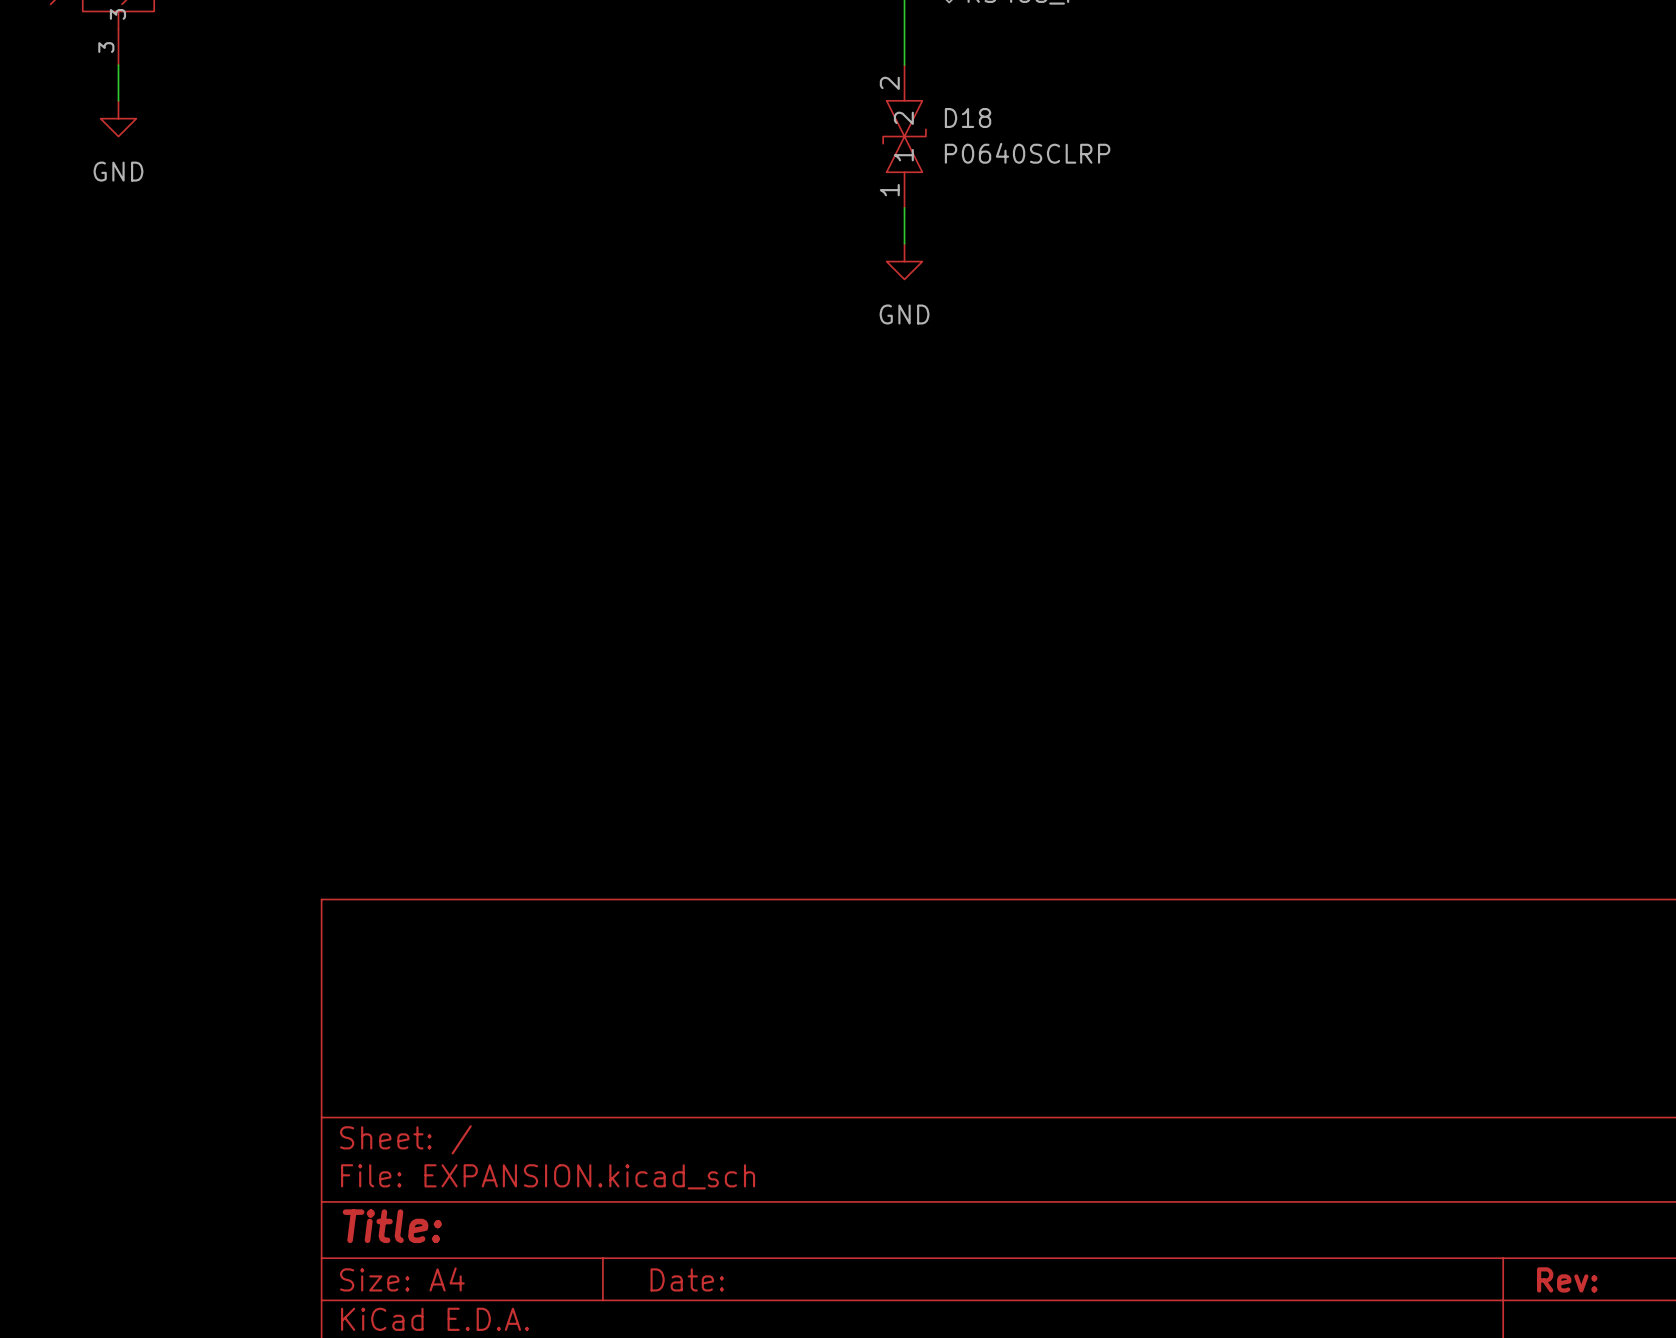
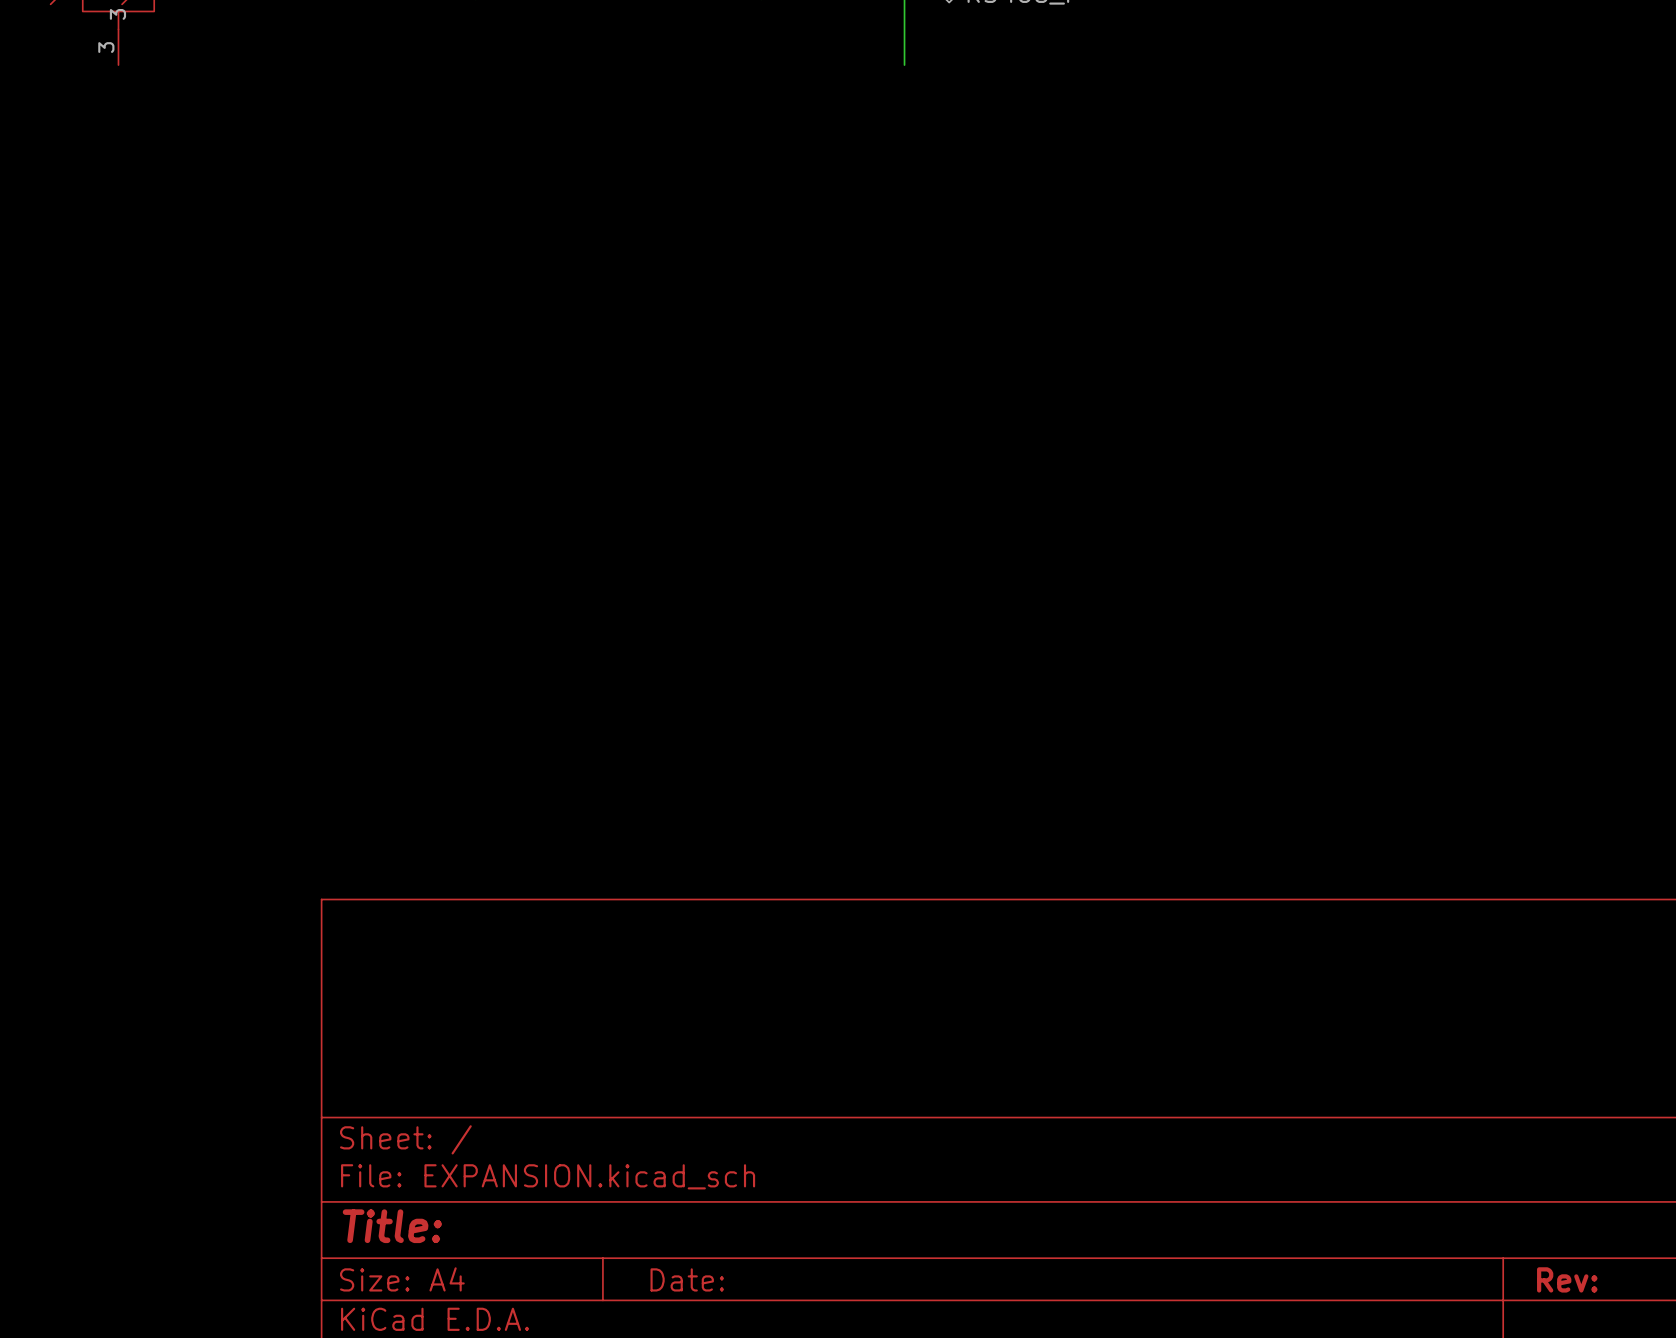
wire: (118, 65) (118, 100) -> none
power symbol: GND (118, 118) -> none
D18: P0640SCLRP (904, 136) -> none
wire: (904, 207) (904, 243) -> none
power symbol: GND (904, 261) -> none

